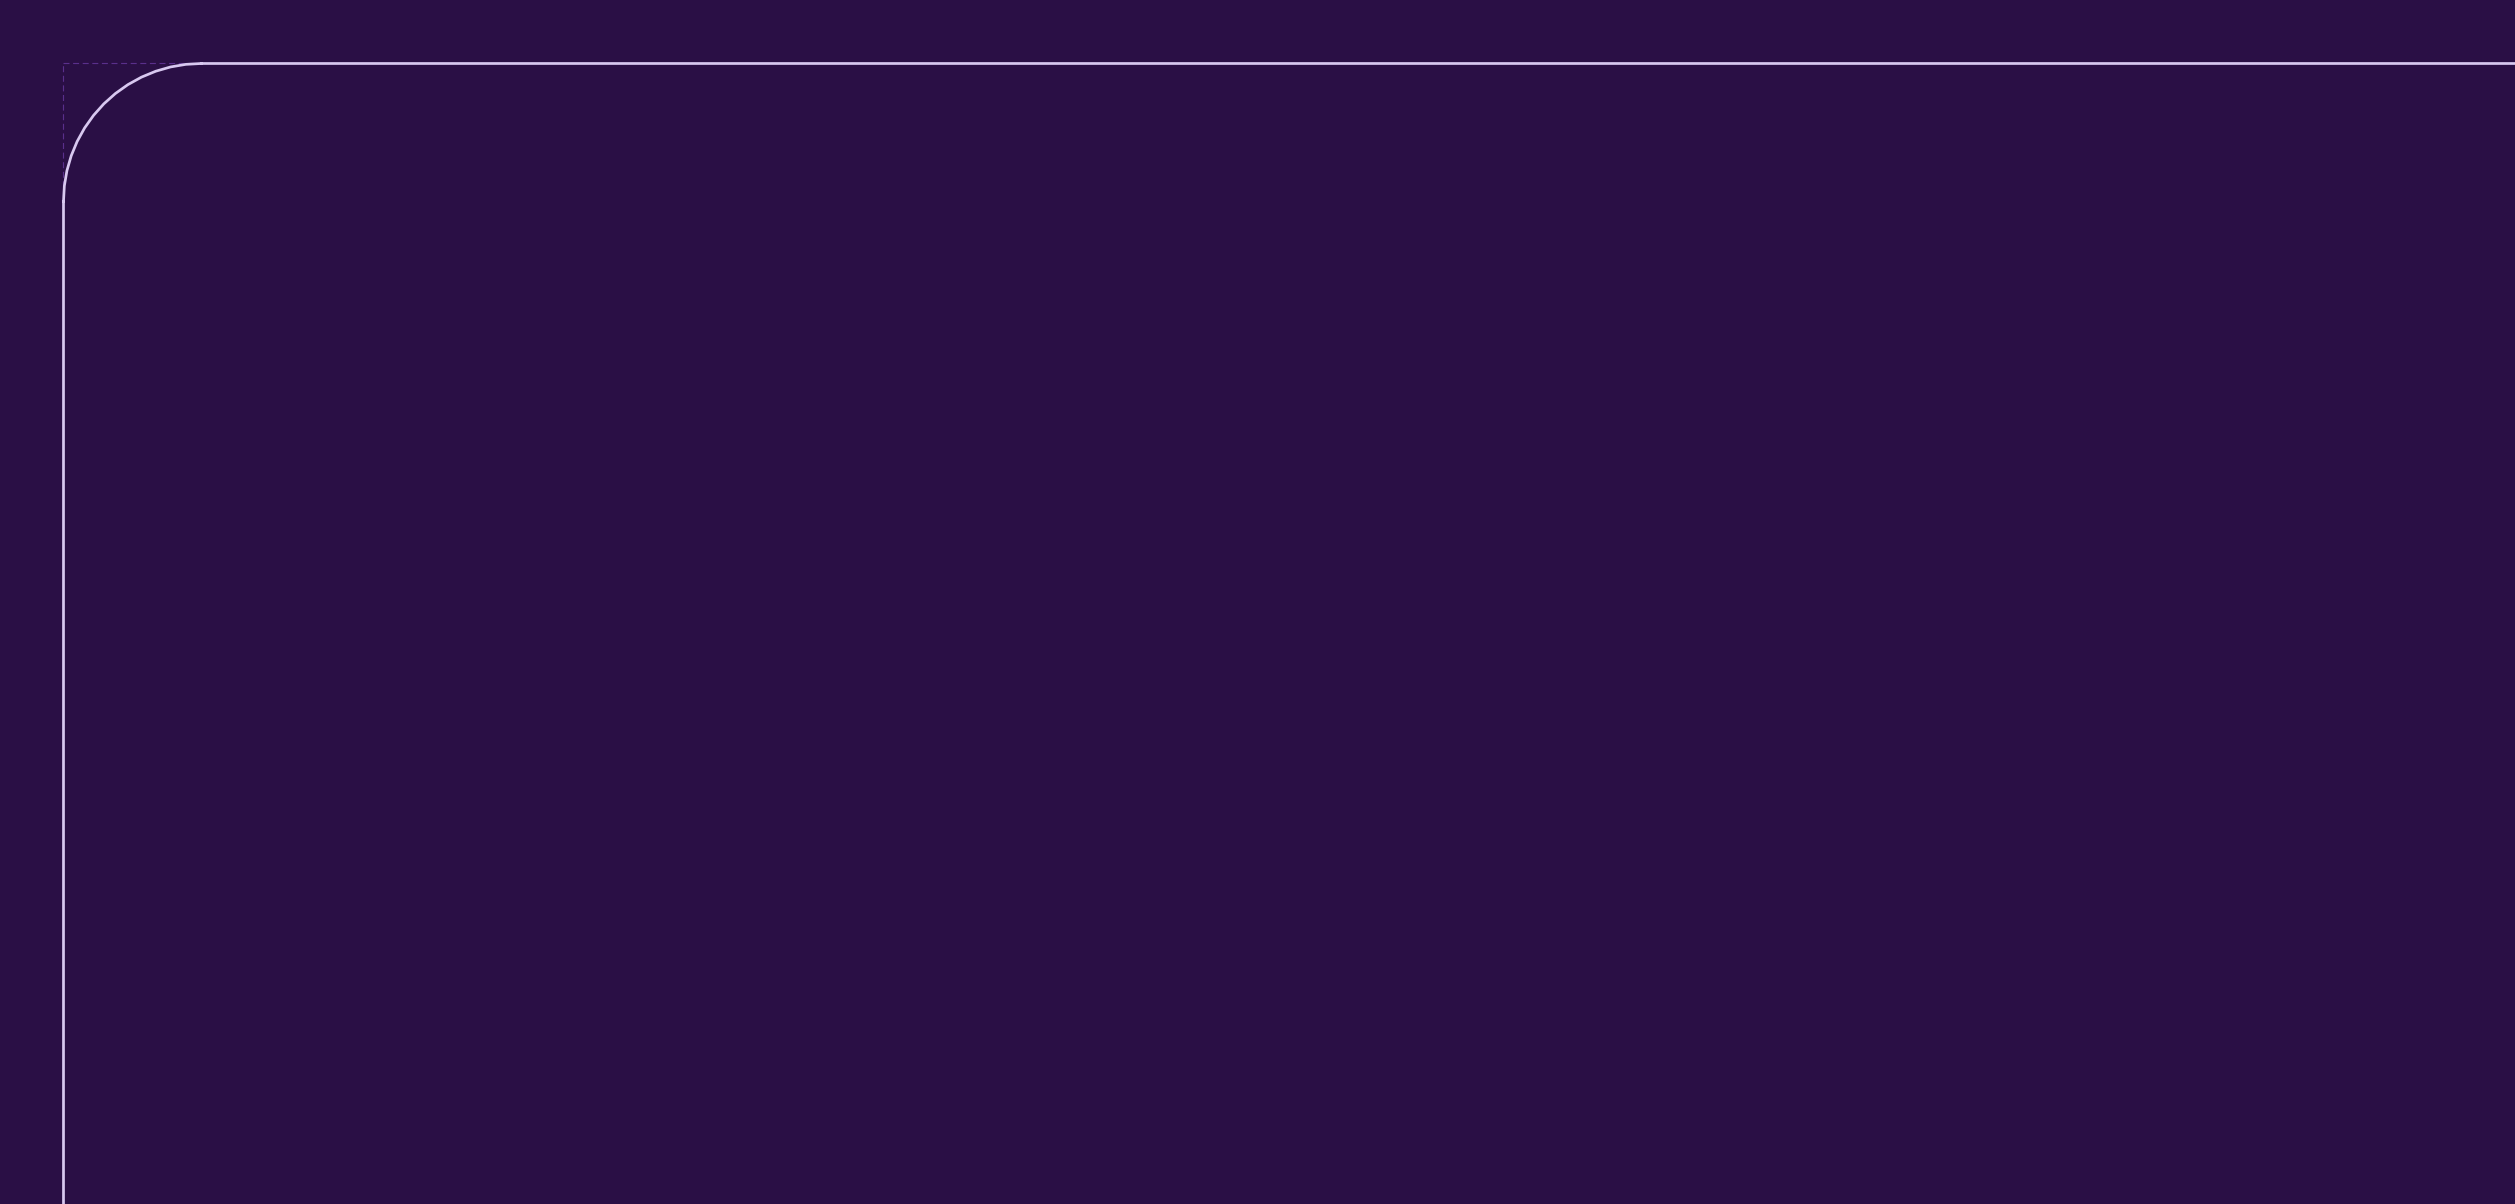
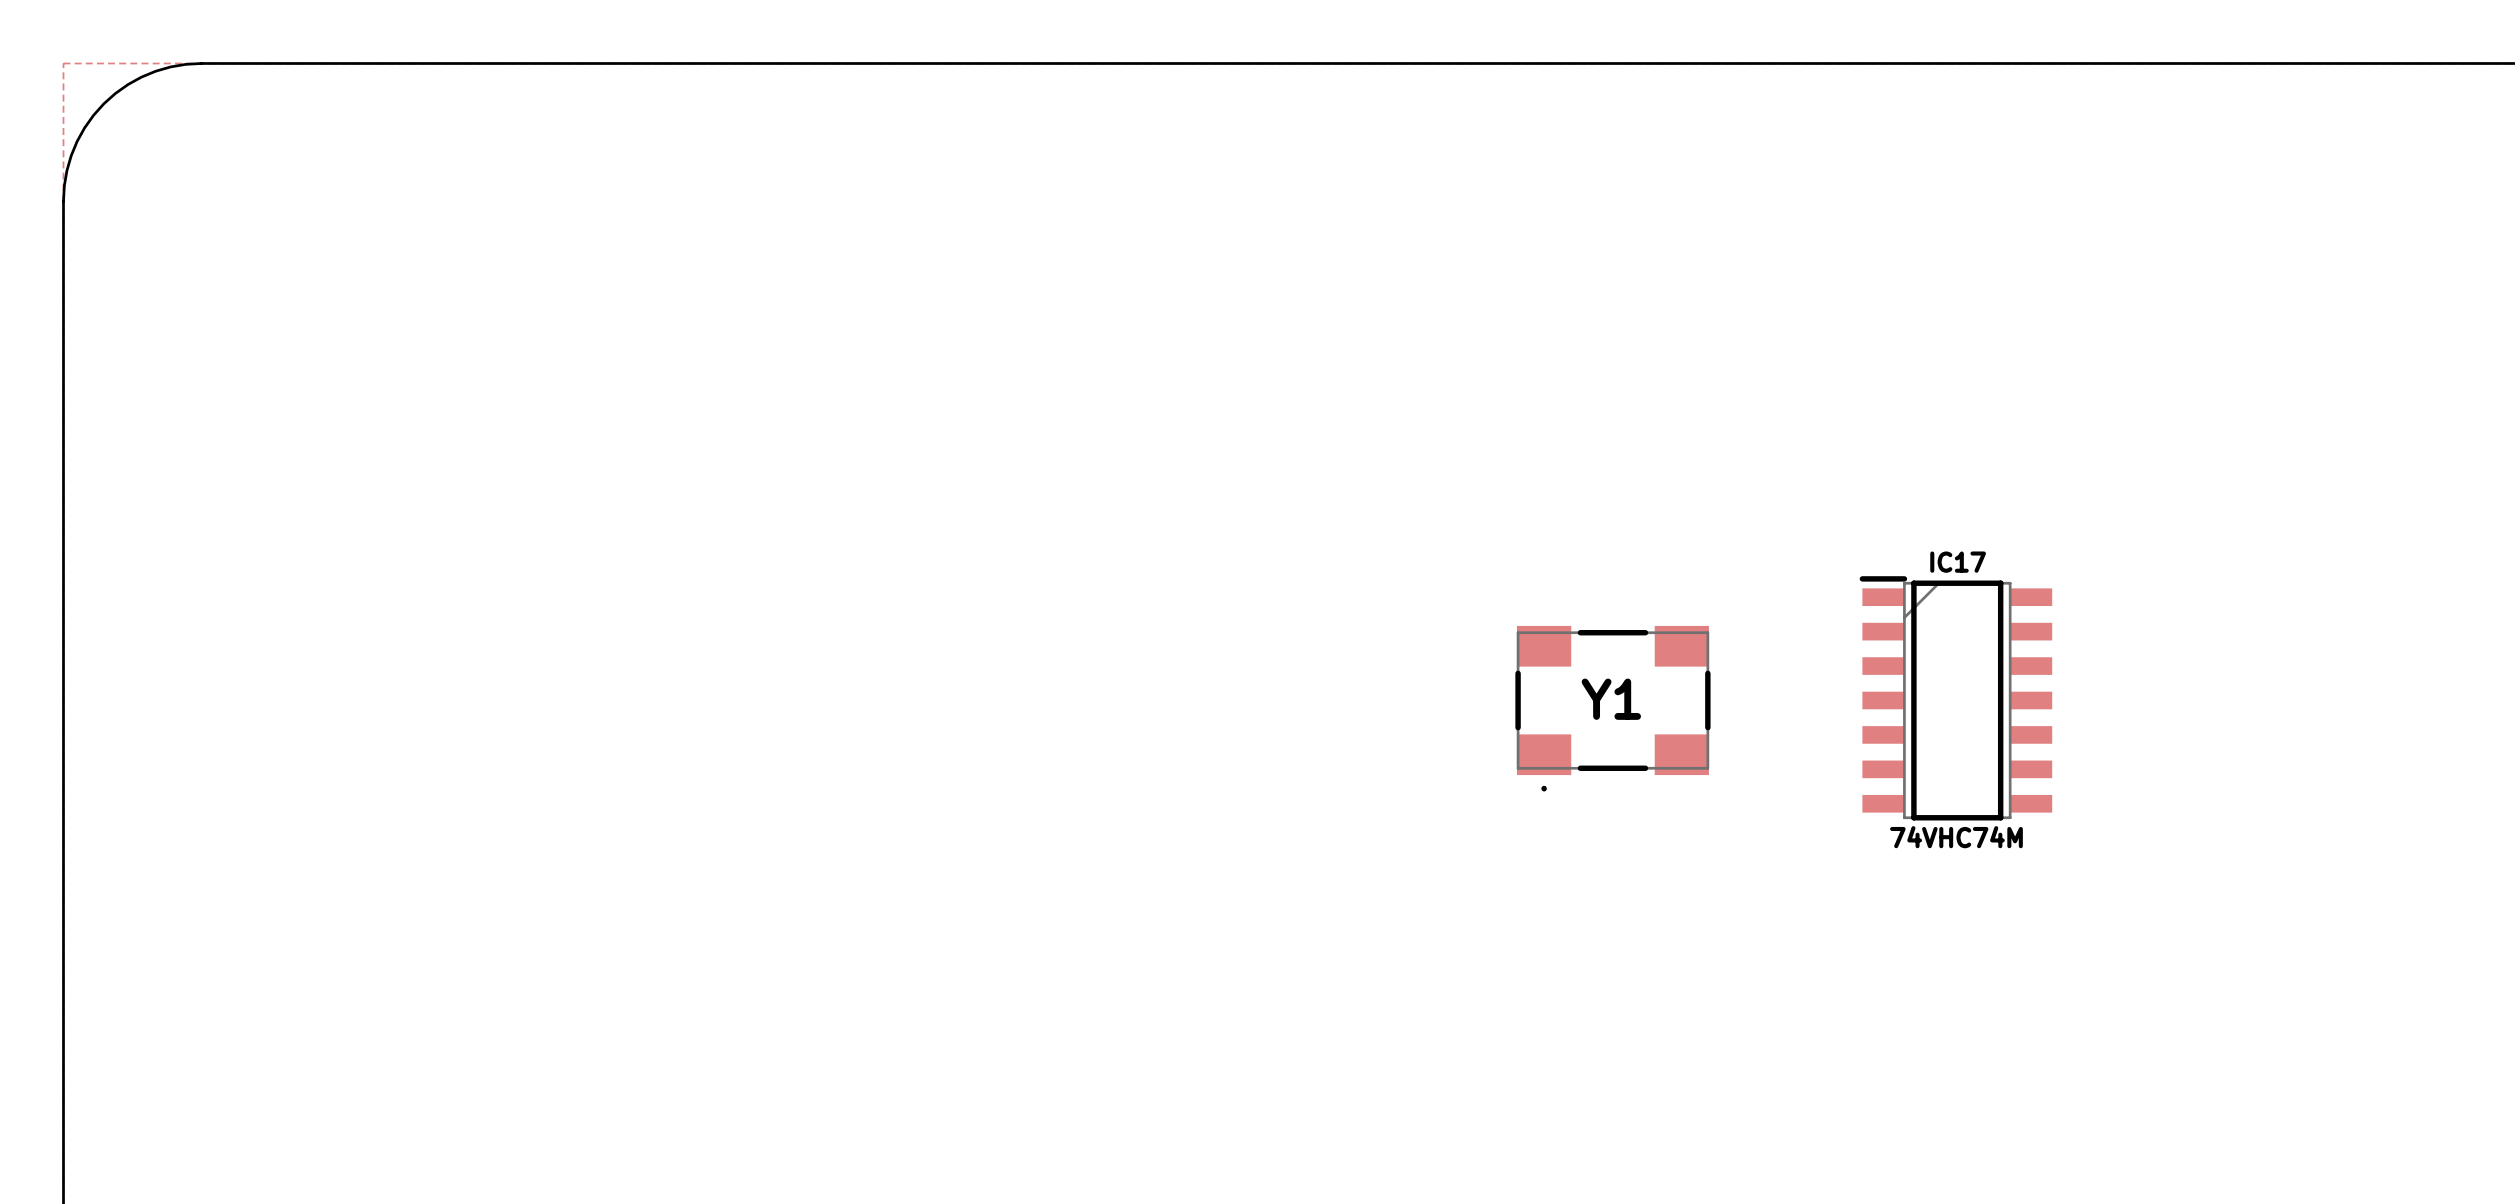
IC17: none -> 74VHC74M (1955, 698)
Y1: none -> (1612, 708)

